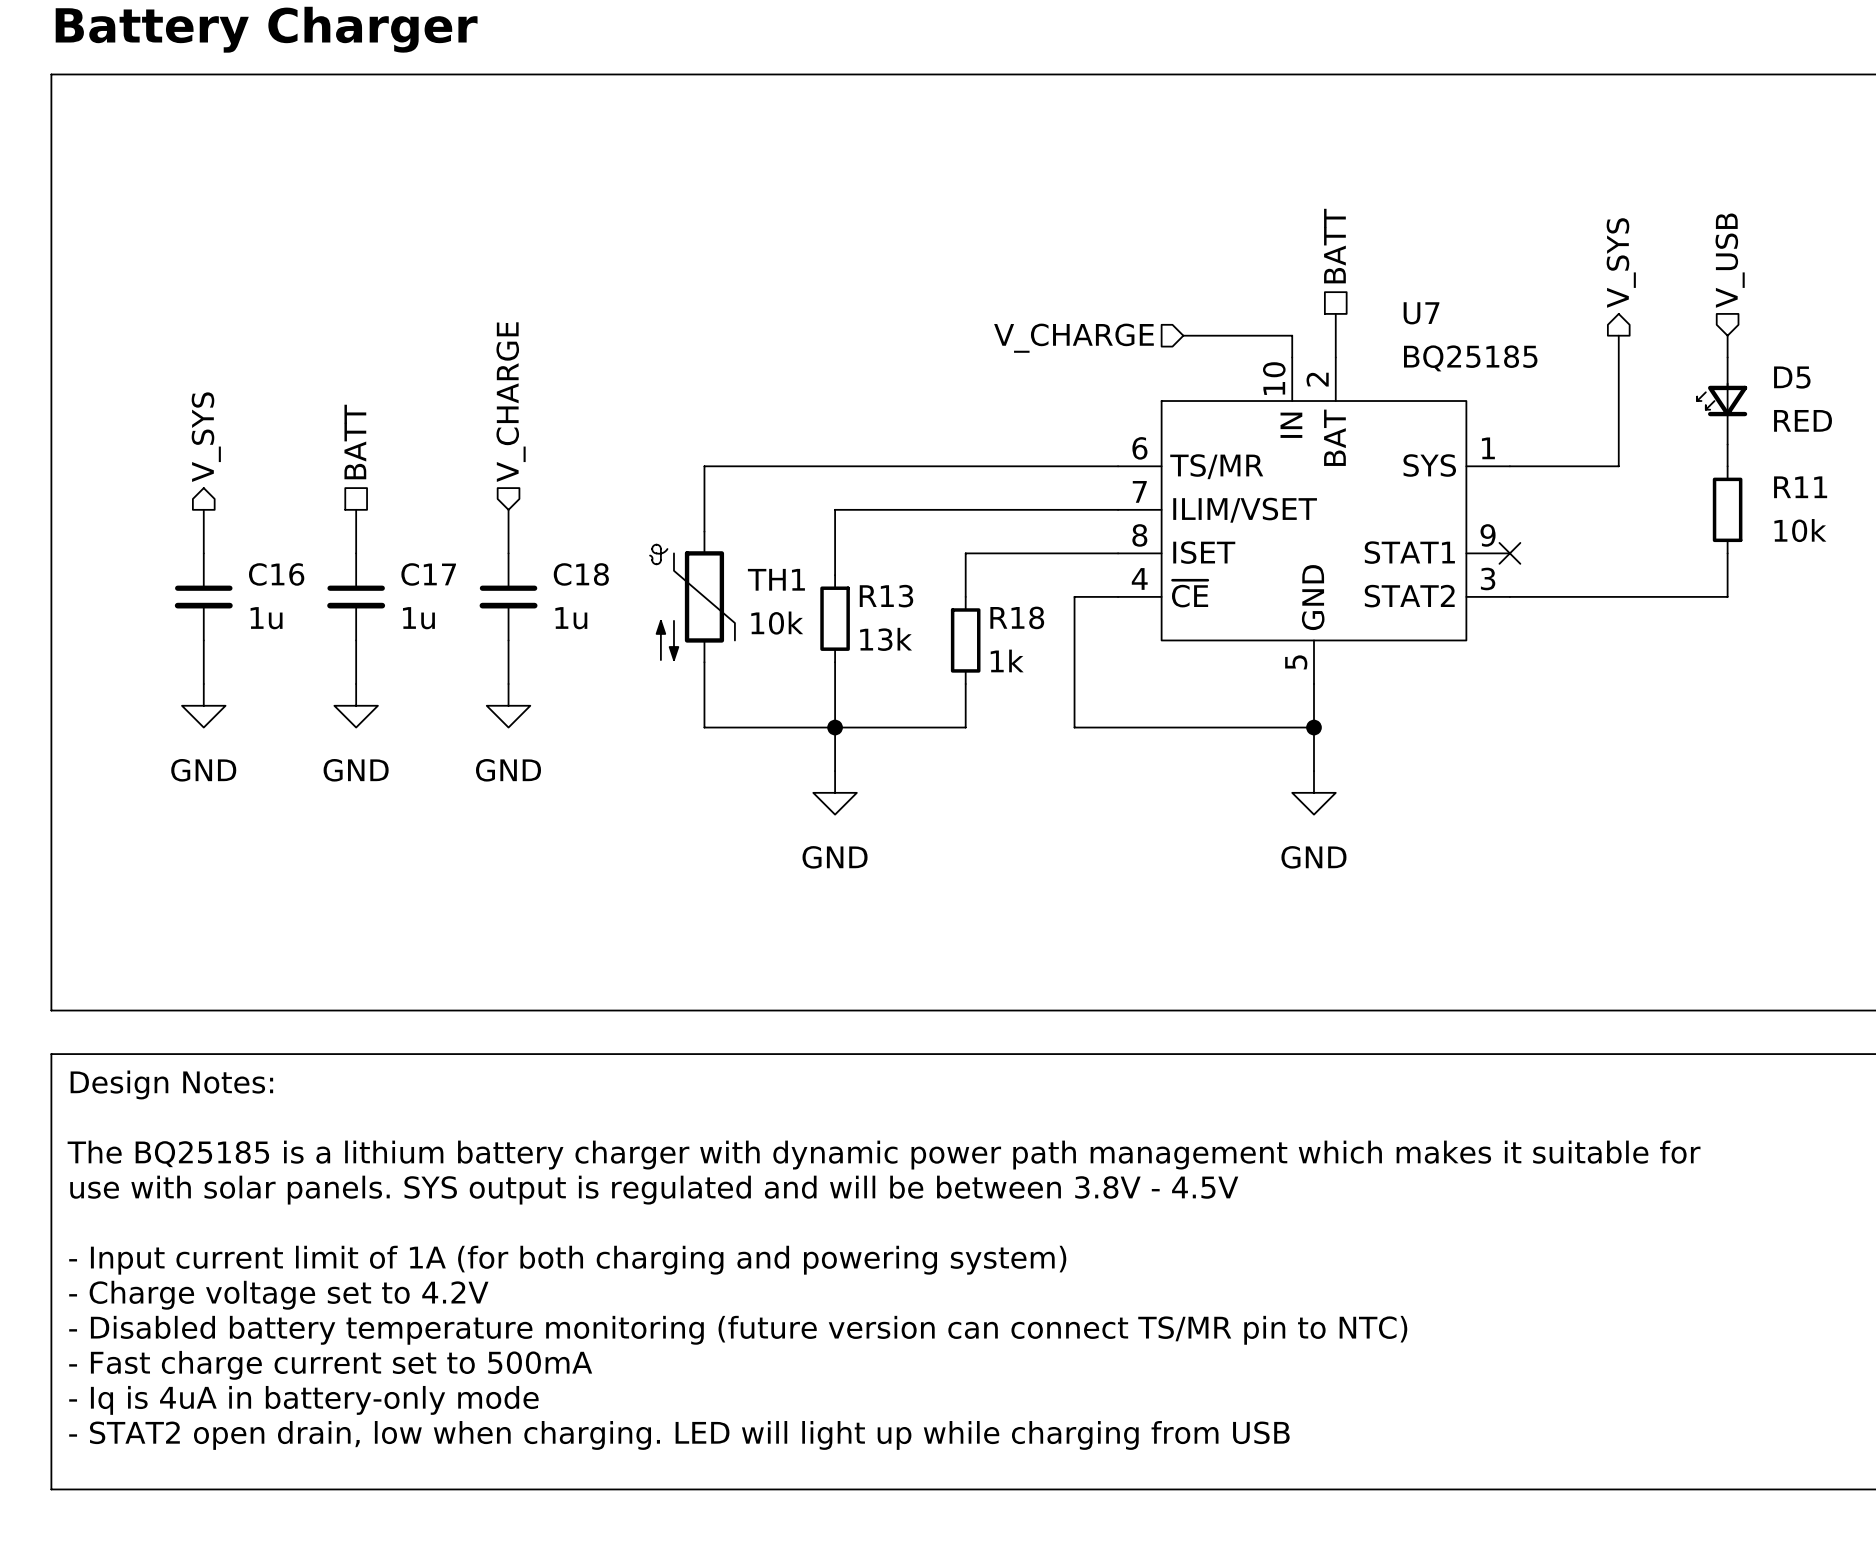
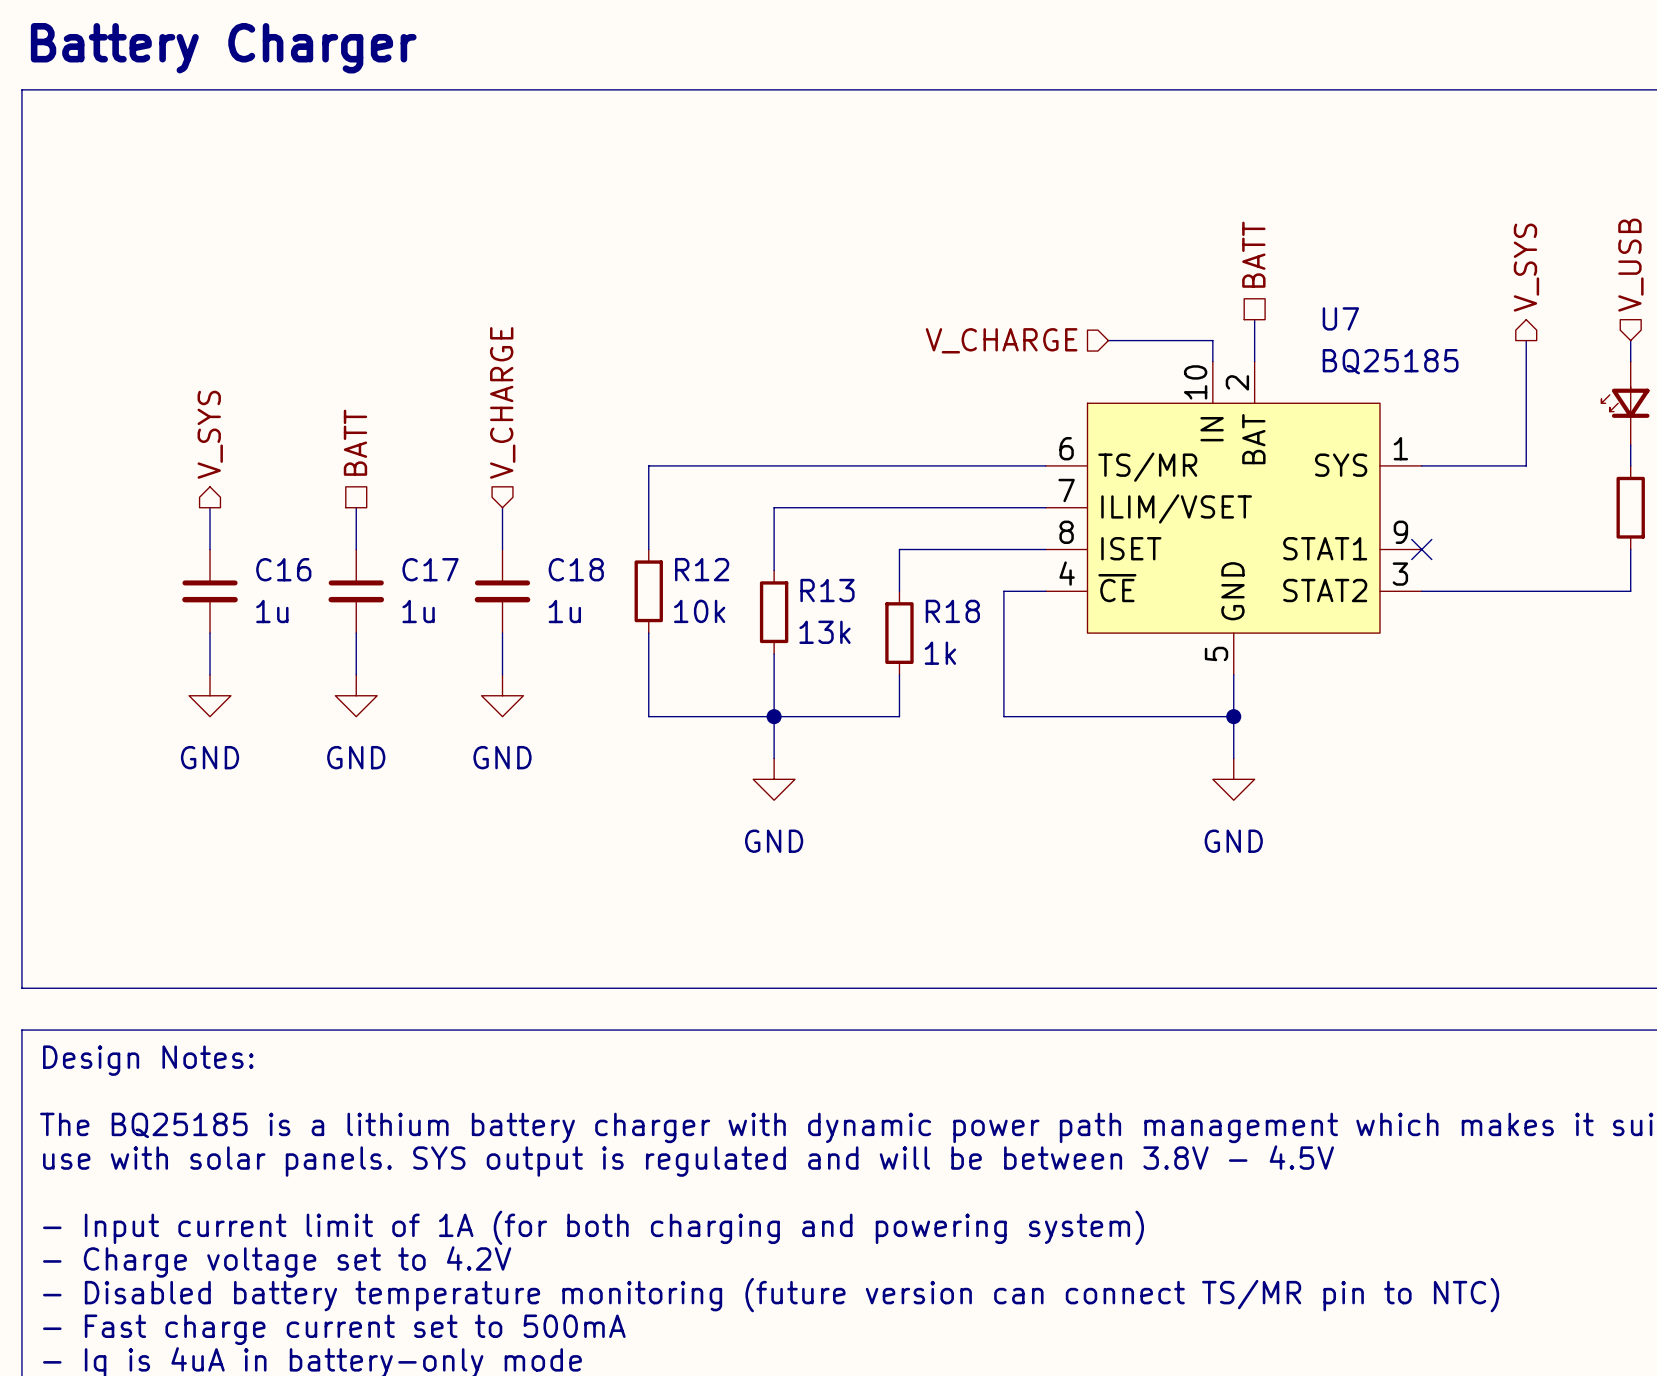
hierarchical label position: V_CHARGE (511, 402) -> V_CHARGE (502, 402)
hierarchical label position: V_SYS (206, 437) -> V_SYS (210, 434)
hierarchical label position: BATT (355, 442) -> BATT (355, 442)
wire: (203, 509) (203, 553) -> (210, 507) (210, 549)
wire: (356, 509) (356, 553) -> (356, 507) (356, 549)
wire: (508, 509) (508, 553) -> (502, 507) (502, 549)
C16 position: (203, 596) -> (210, 591)
C17 position: (356, 596) -> (356, 591)
C18 position: (508, 596) -> (502, 591)
TH1: 10k (692, 596) -> none
R12: none -> 10k (648, 591)
wire: (203, 640) (203, 684) -> (210, 633) (210, 674)
wire: (356, 640) (356, 684) -> (356, 633) (356, 674)
wire: (508, 640) (508, 684) -> (502, 633) (502, 674)
power symbol position: GND (203, 705) -> GND (210, 695)
power symbol position: GND (356, 705) -> GND (356, 695)
power symbol position: GND (508, 705) -> GND (502, 695)

